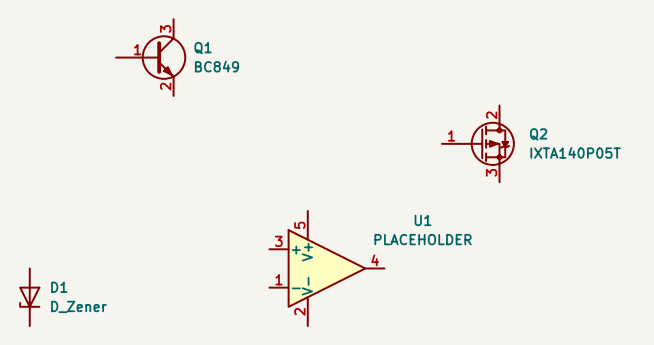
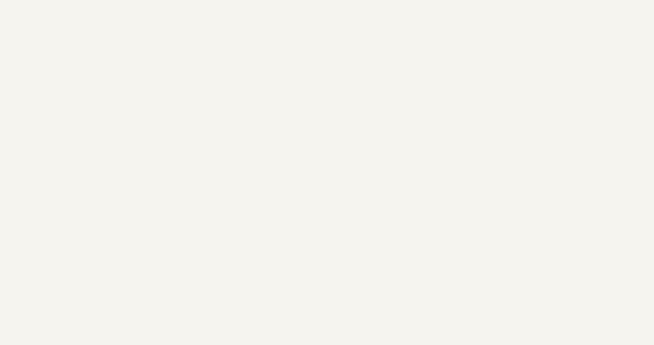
Q1: BC849 (151, 57) -> none
Q2: IXTA140P05T (478, 143) -> none
U1: PLACEHOLDER (326, 268) -> none
D1: D_Zener (29, 297) -> none

